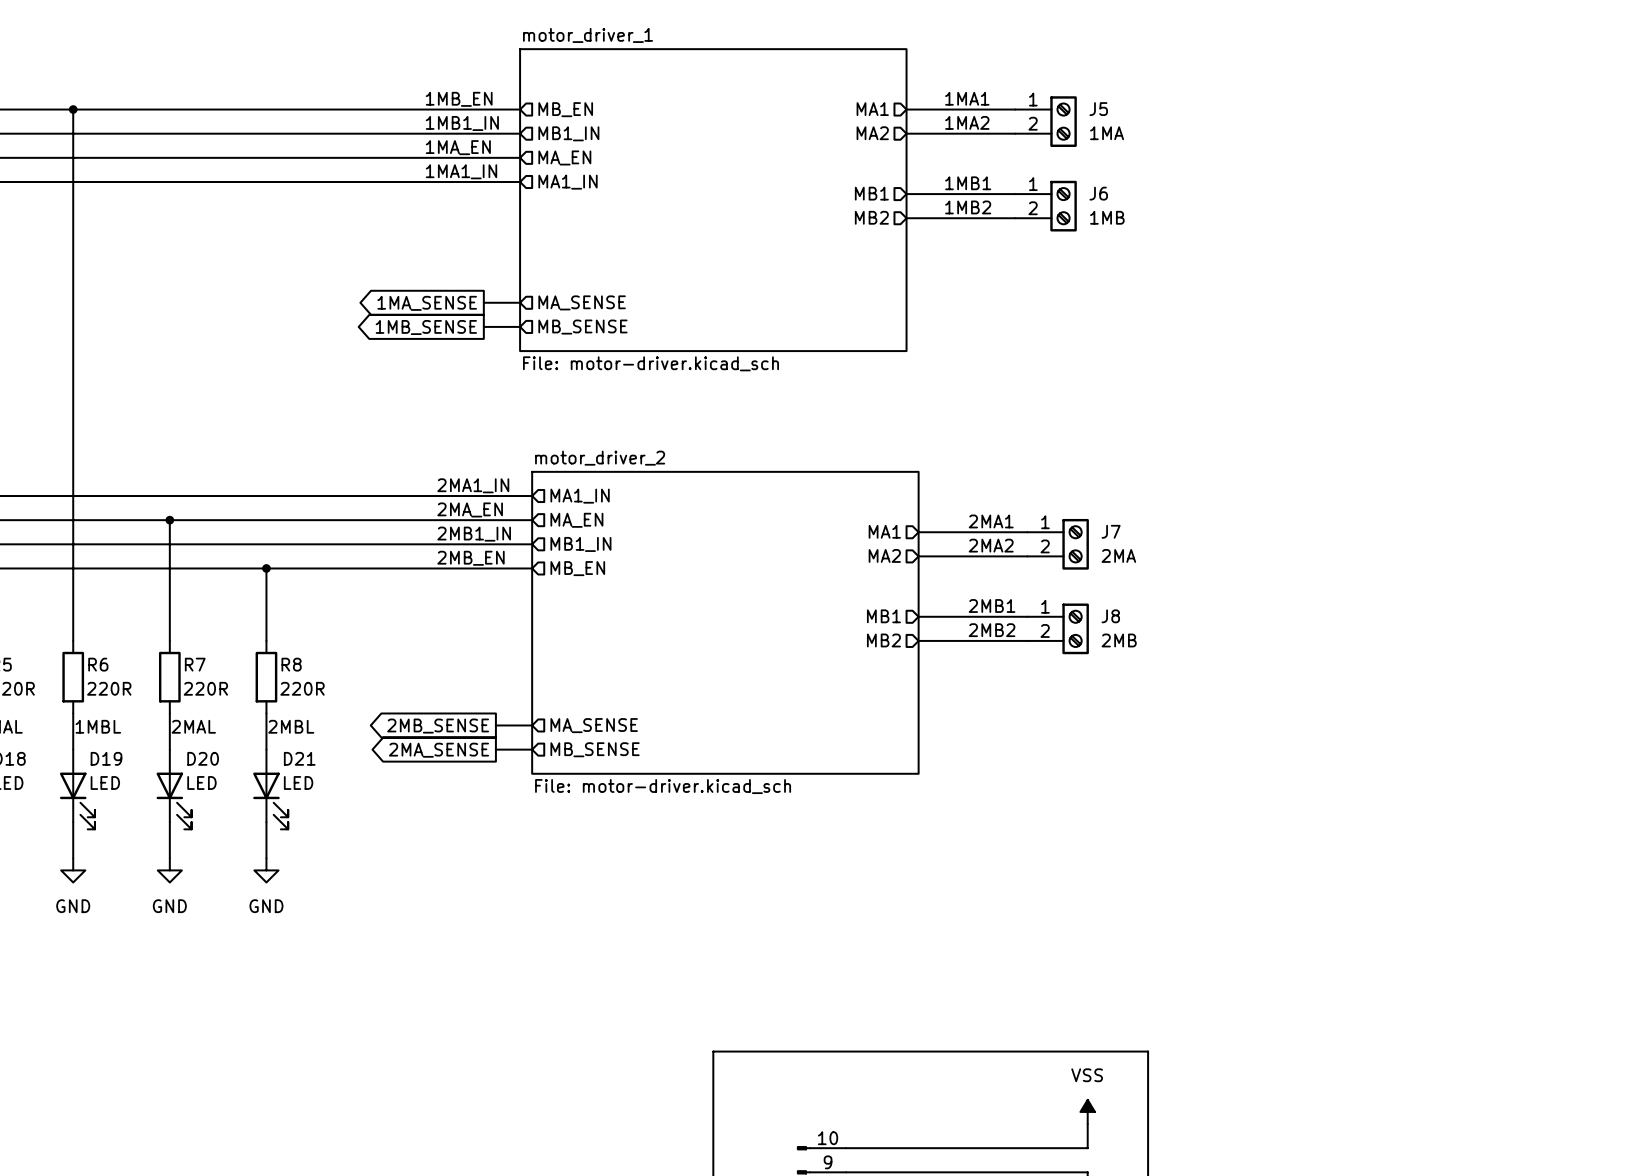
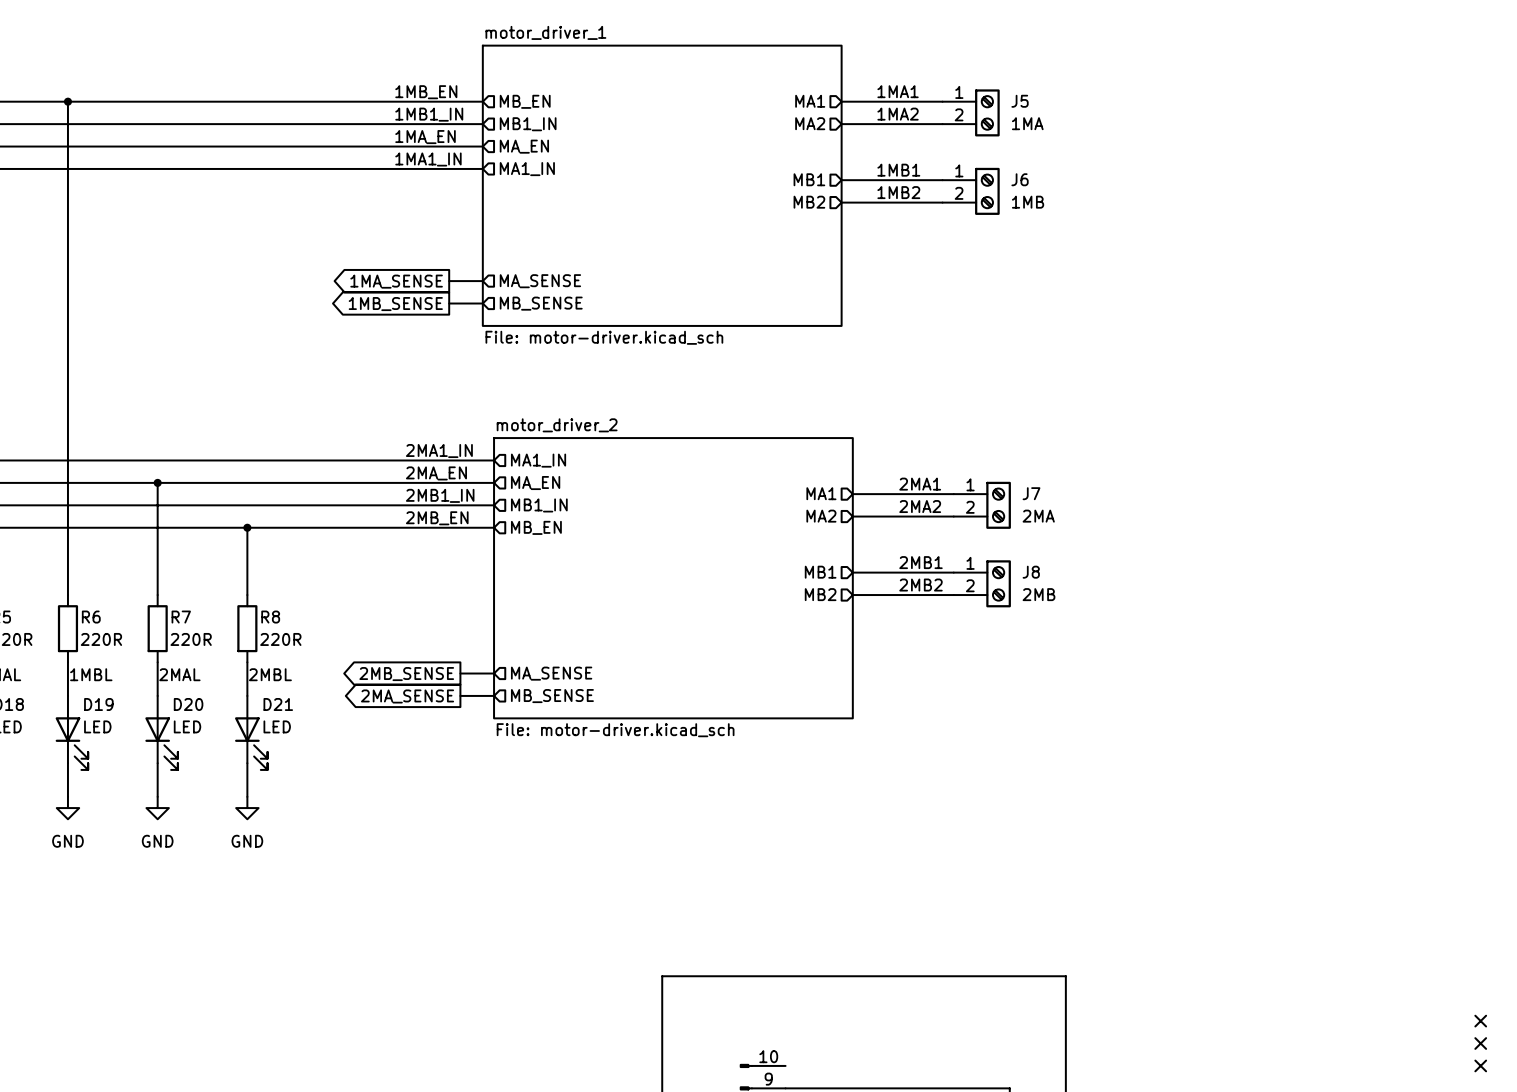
no-connect mark: none -> (1480, 1021)
power symbol: VSS (1087, 1111) -> none
wire: (1087, 1124) (1087, 1148) (846, 1148) -> none
no-connect mark: none -> (1480, 1043)
no-connect mark: none -> (1480, 1065)

